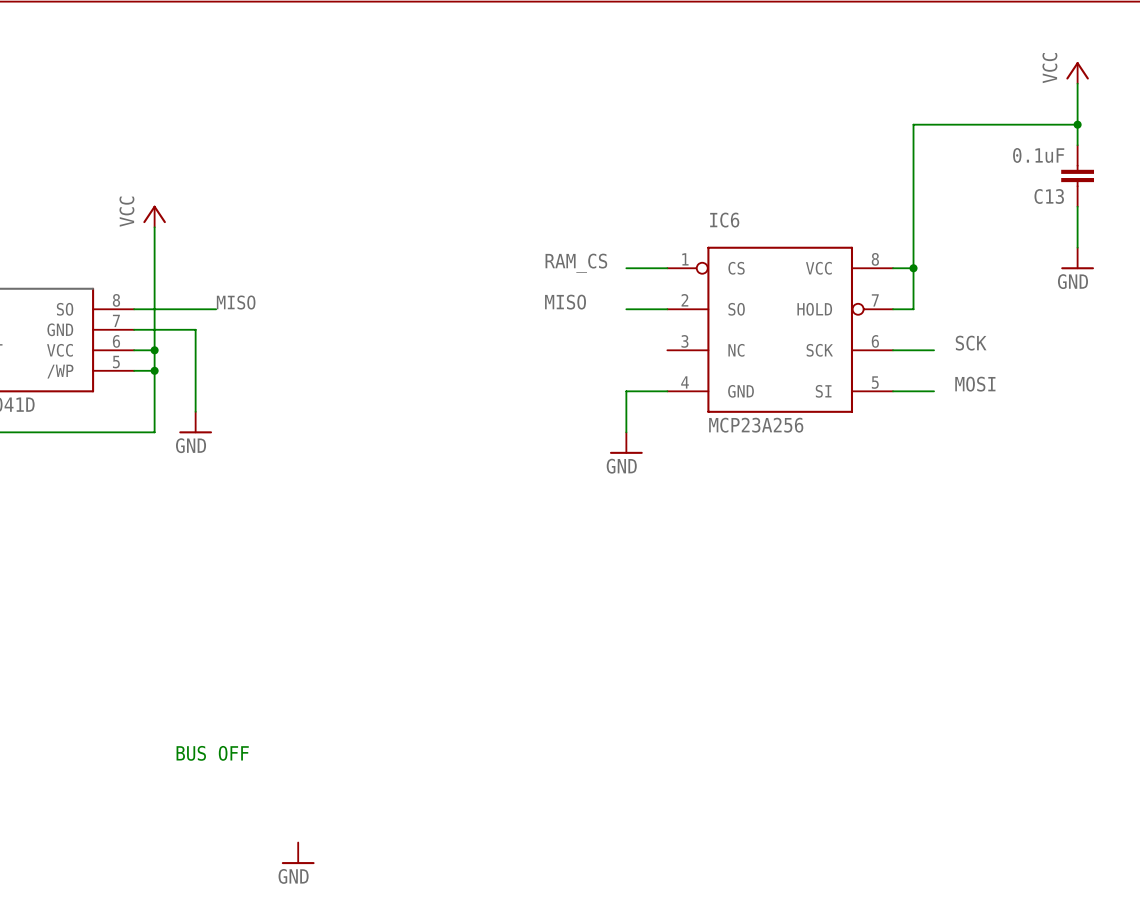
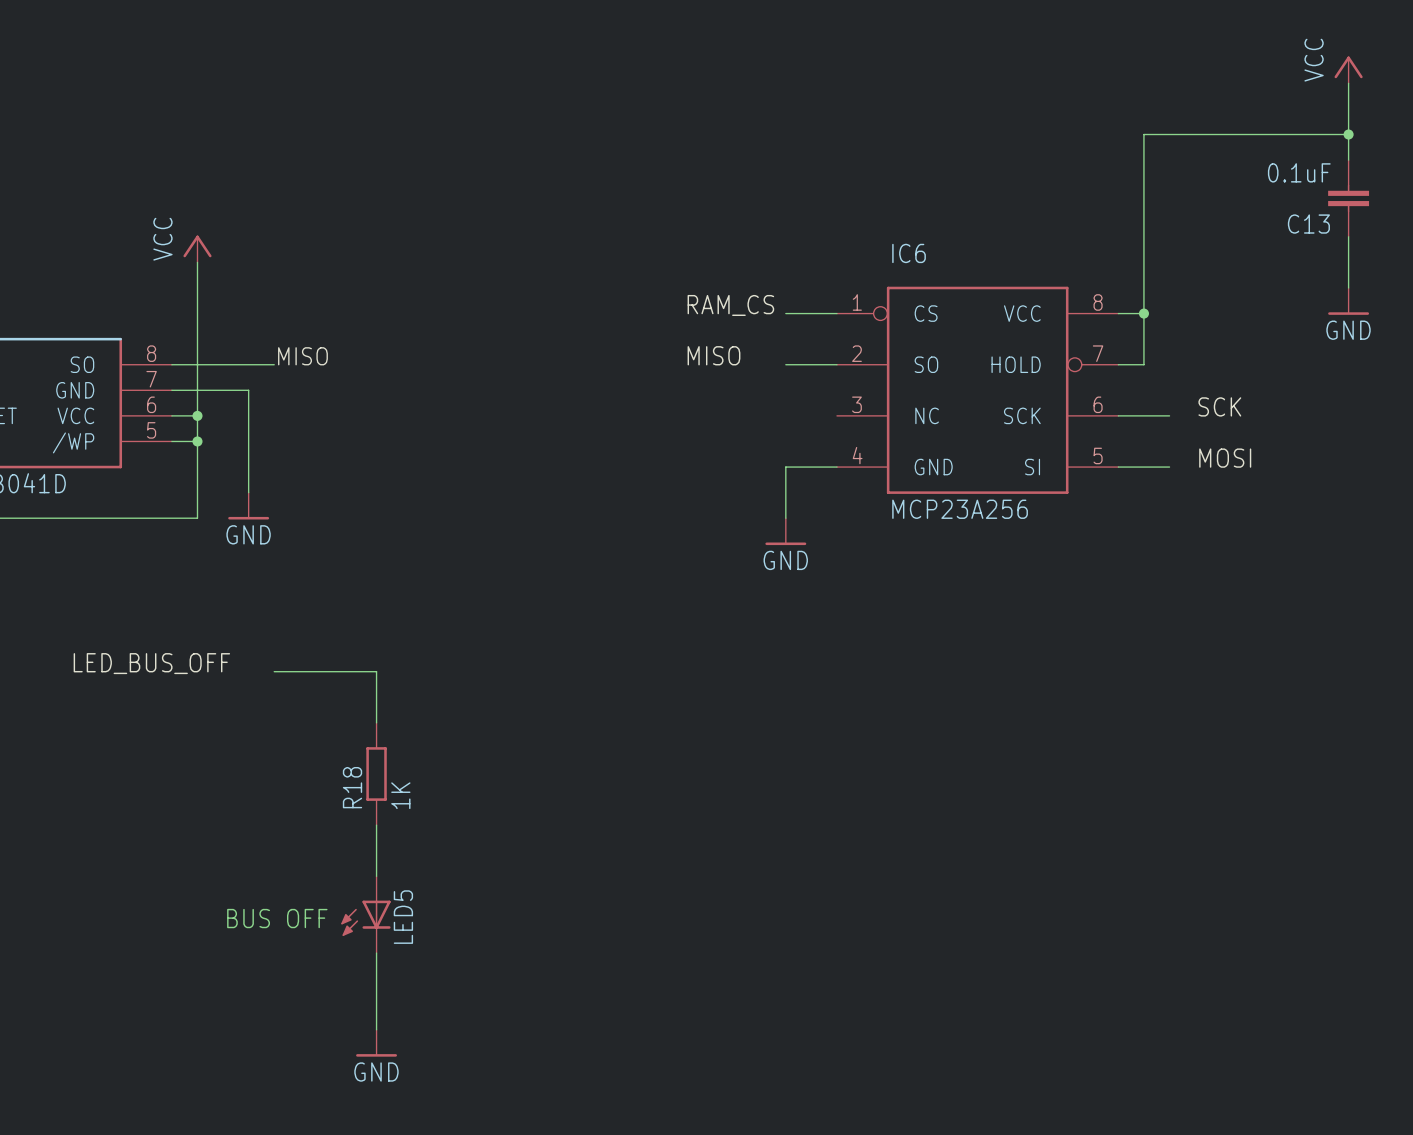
label: none -> LED_BUS_OFF (151, 663)
wire: none -> (274, 671) (376, 671) (376, 722)
R18: none -> 1K (376, 774)
wire: none -> (376, 825) (376, 876)
LED5: none -> (365, 914)
wire: none -> (376, 953) (376, 1029)

